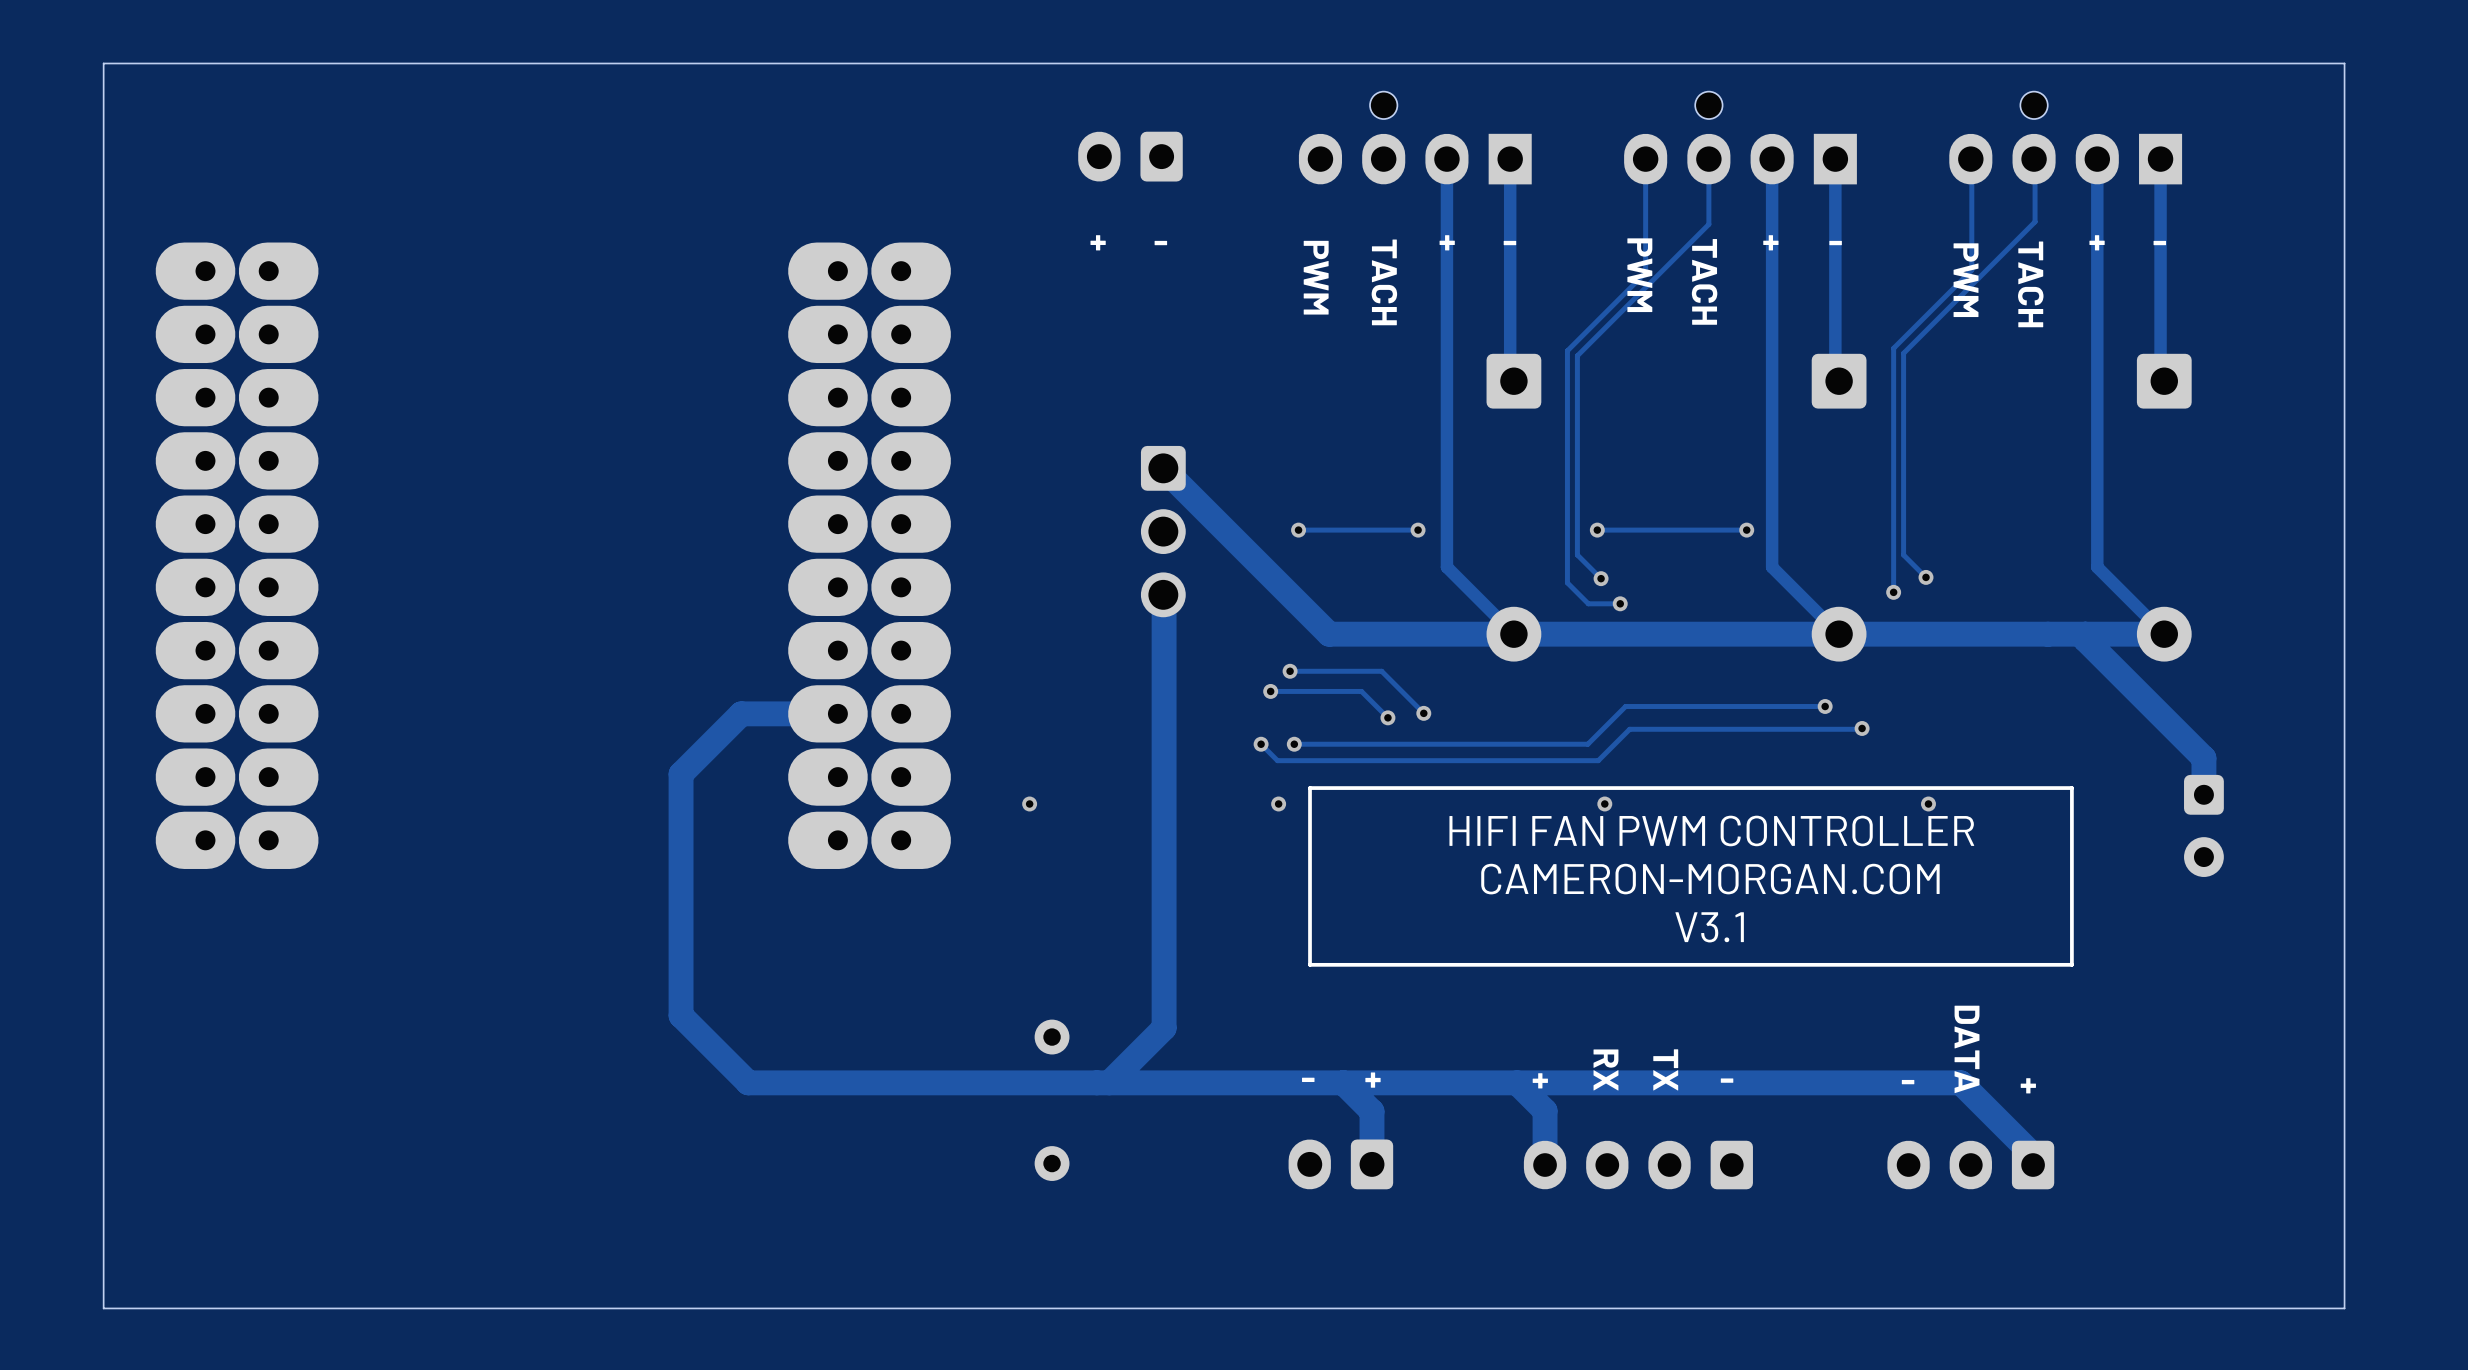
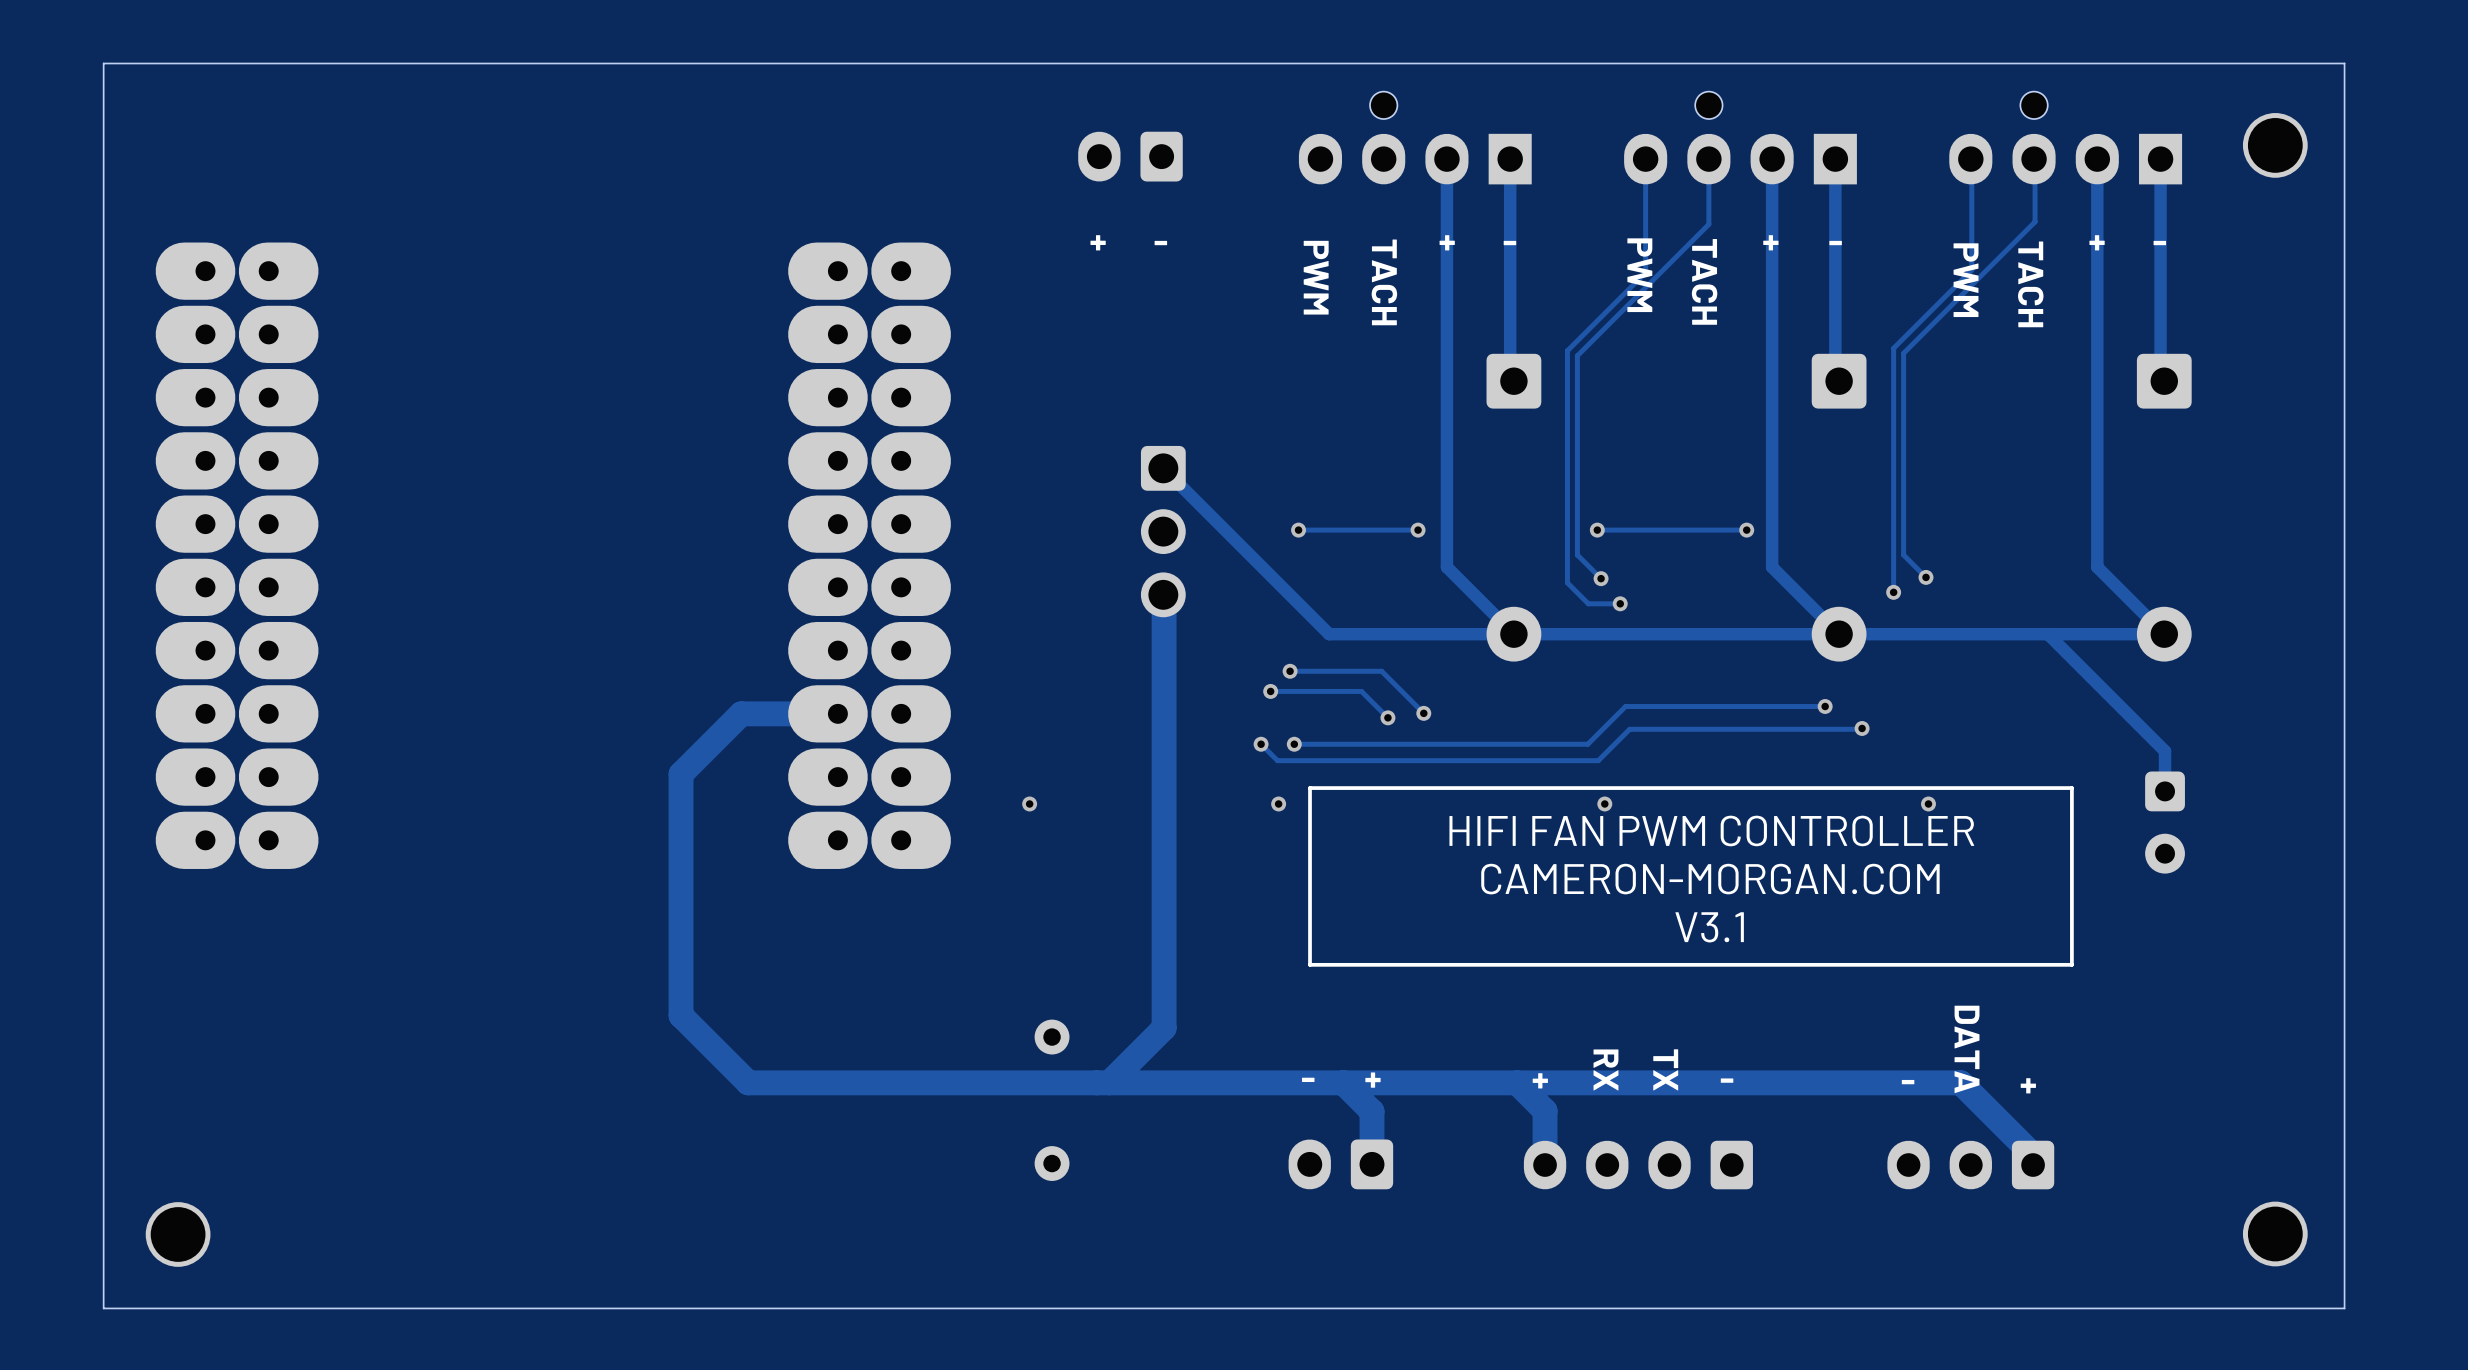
part: none -> (2275, 145)
track width: thick (1163, 468) (1329, 634) (2164, 634) -> thin (1163, 468) (1329, 634) (2164, 634)
track: none -> (2048, 634) (2165, 751) (2165, 791)
track: (2085, 634) (2085, 639) (2203, 758) (2203, 794) -> none
part position: (2203, 825) -> (2165, 822)
part: none -> (2275, 1233)
part: none -> (178, 1234)

